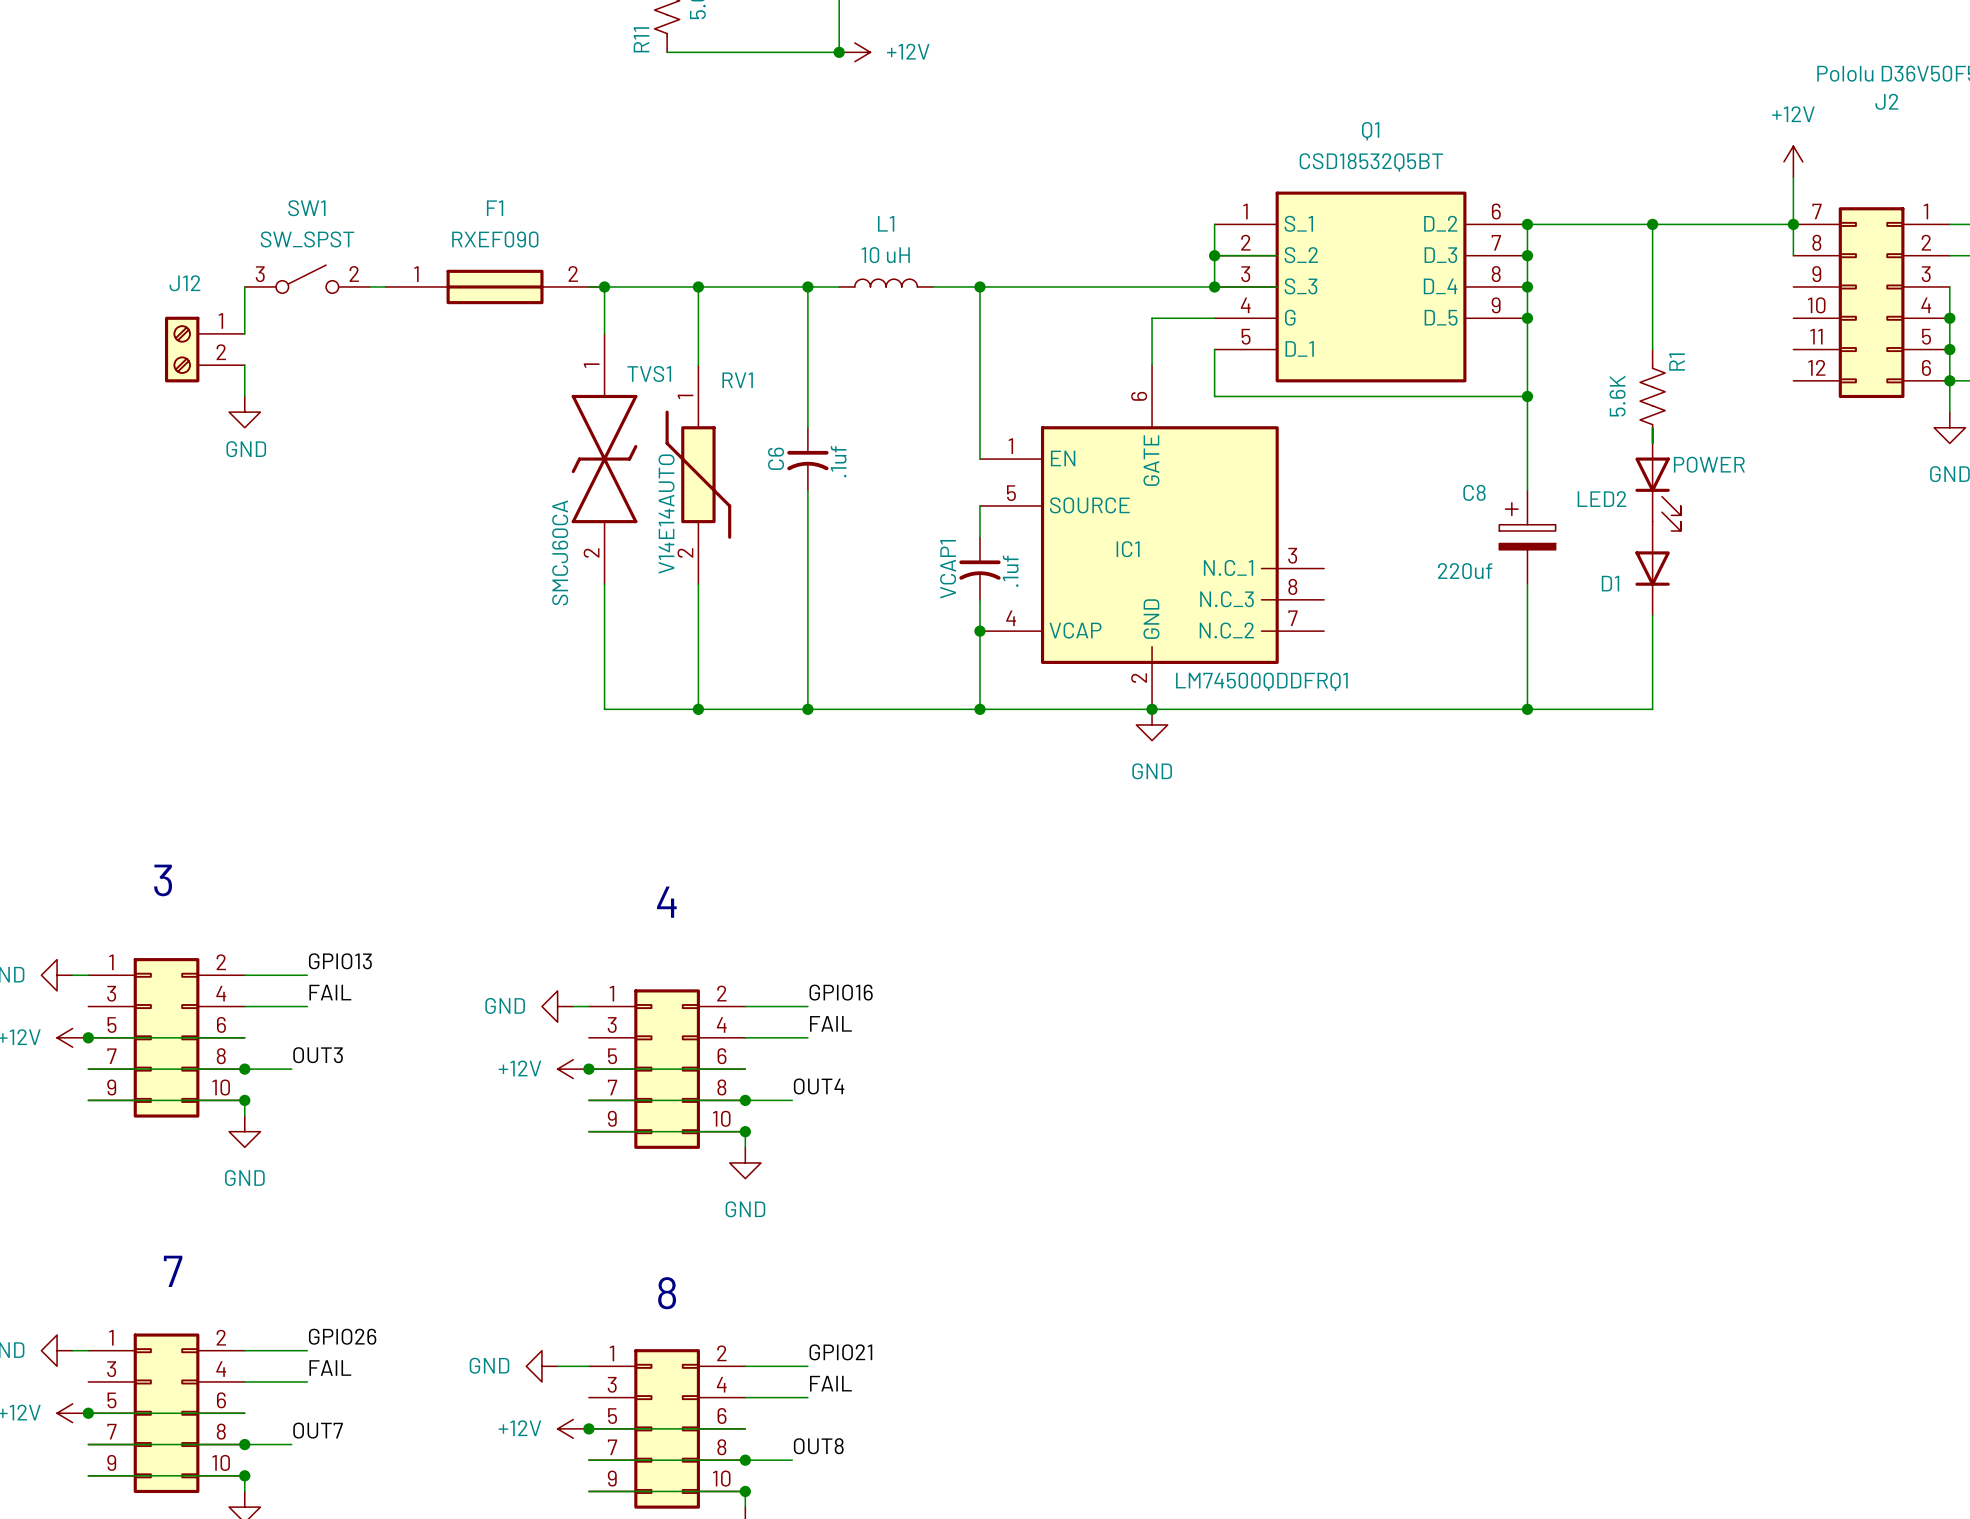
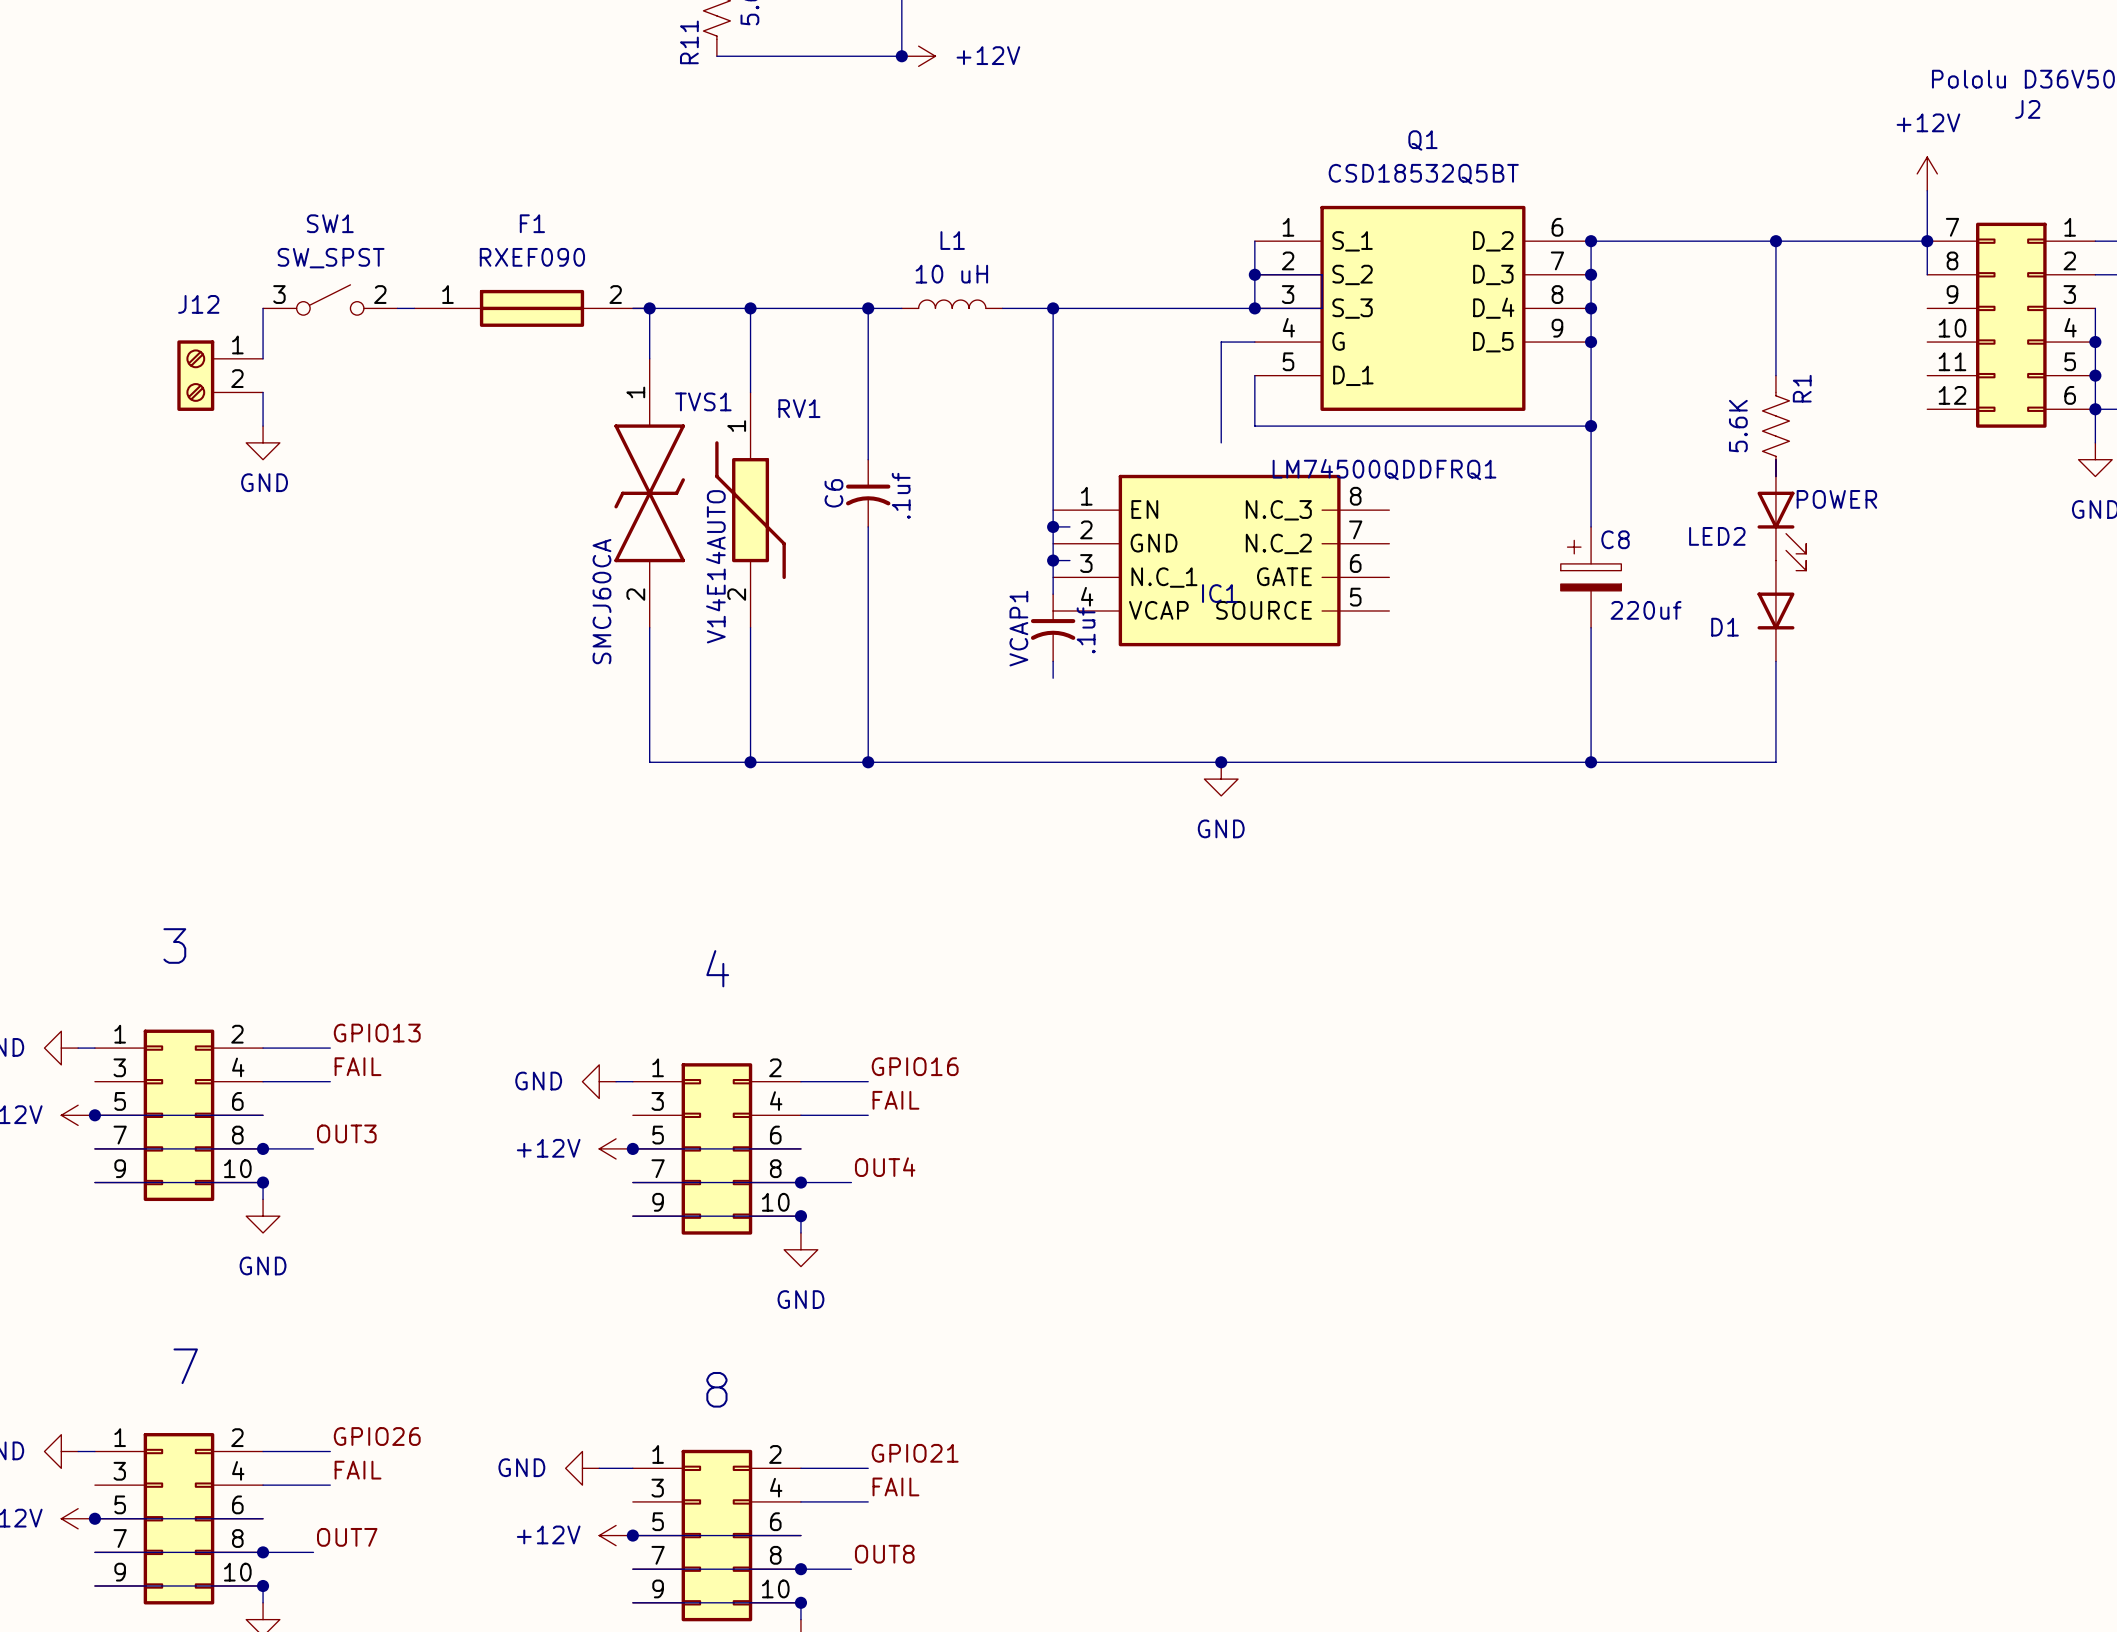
wire: (1214, 224) (1214, 286) -> (1254, 241) (1254, 308)
junction: none -> (1591, 241)
wire: (1527, 224) (1527, 490) -> (1641, 241) (1591, 241) (1591, 526)
junction: (1527, 224) -> none
junction: none -> (1254, 274)
junction: (1214, 255) -> none
junction: none -> (1591, 274)
junction: (1527, 255) -> none
junction: none -> (1254, 308)
junction: (1214, 286) -> none
Q1 position: (1371, 286) -> (1422, 308)
junction: none -> (1591, 308)
junction: (1527, 286) -> none
wire: (1152, 318) (1152, 365) -> (1238, 342) (1221, 342) (1221, 442)
junction: none -> (1591, 342)
junction: (1527, 318) -> none
wire: (1214, 349) (1214, 396) -> (1254, 375) (1254, 426) (1305, 426)
IC1 symbol: [979, 365, 1325, 710] -> [1053, 474, 1390, 647]
wire: (1480, 396) (1527, 396) -> none
junction: none -> (1591, 426)
junction: (1527, 396) -> none
wire: none -> (1053, 493) (1053, 543)
wire: none -> (1053, 526) (1069, 526)
junction: none -> (1053, 526)
C8 name position: C8 (1474, 492) -> C8 (1615, 539)
wire: none -> (1053, 560) (1069, 560)
junction: none -> (1053, 560)
C8 position: (1527, 537) -> (1591, 577)
VCAP1 position: (979, 568) -> (1053, 627)
C8 value position: 220uf (1465, 571) -> 220uf (1646, 610)
wire: (1527, 584) (1527, 709) -> (1591, 627) (1591, 762)
wire: (979, 631) (979, 709) -> none
junction: (979, 631) -> none
IC1 value position: LM74500QDDFRQ1 (1261, 681) -> LM74500QDDFRQ1 (1384, 469)
junction: (979, 709) -> none
junction position: (1152, 709) -> (1221, 762)
junction position: (1527, 709) -> (1591, 762)
power symbol position: GND (1152, 724) -> GND (1221, 779)

